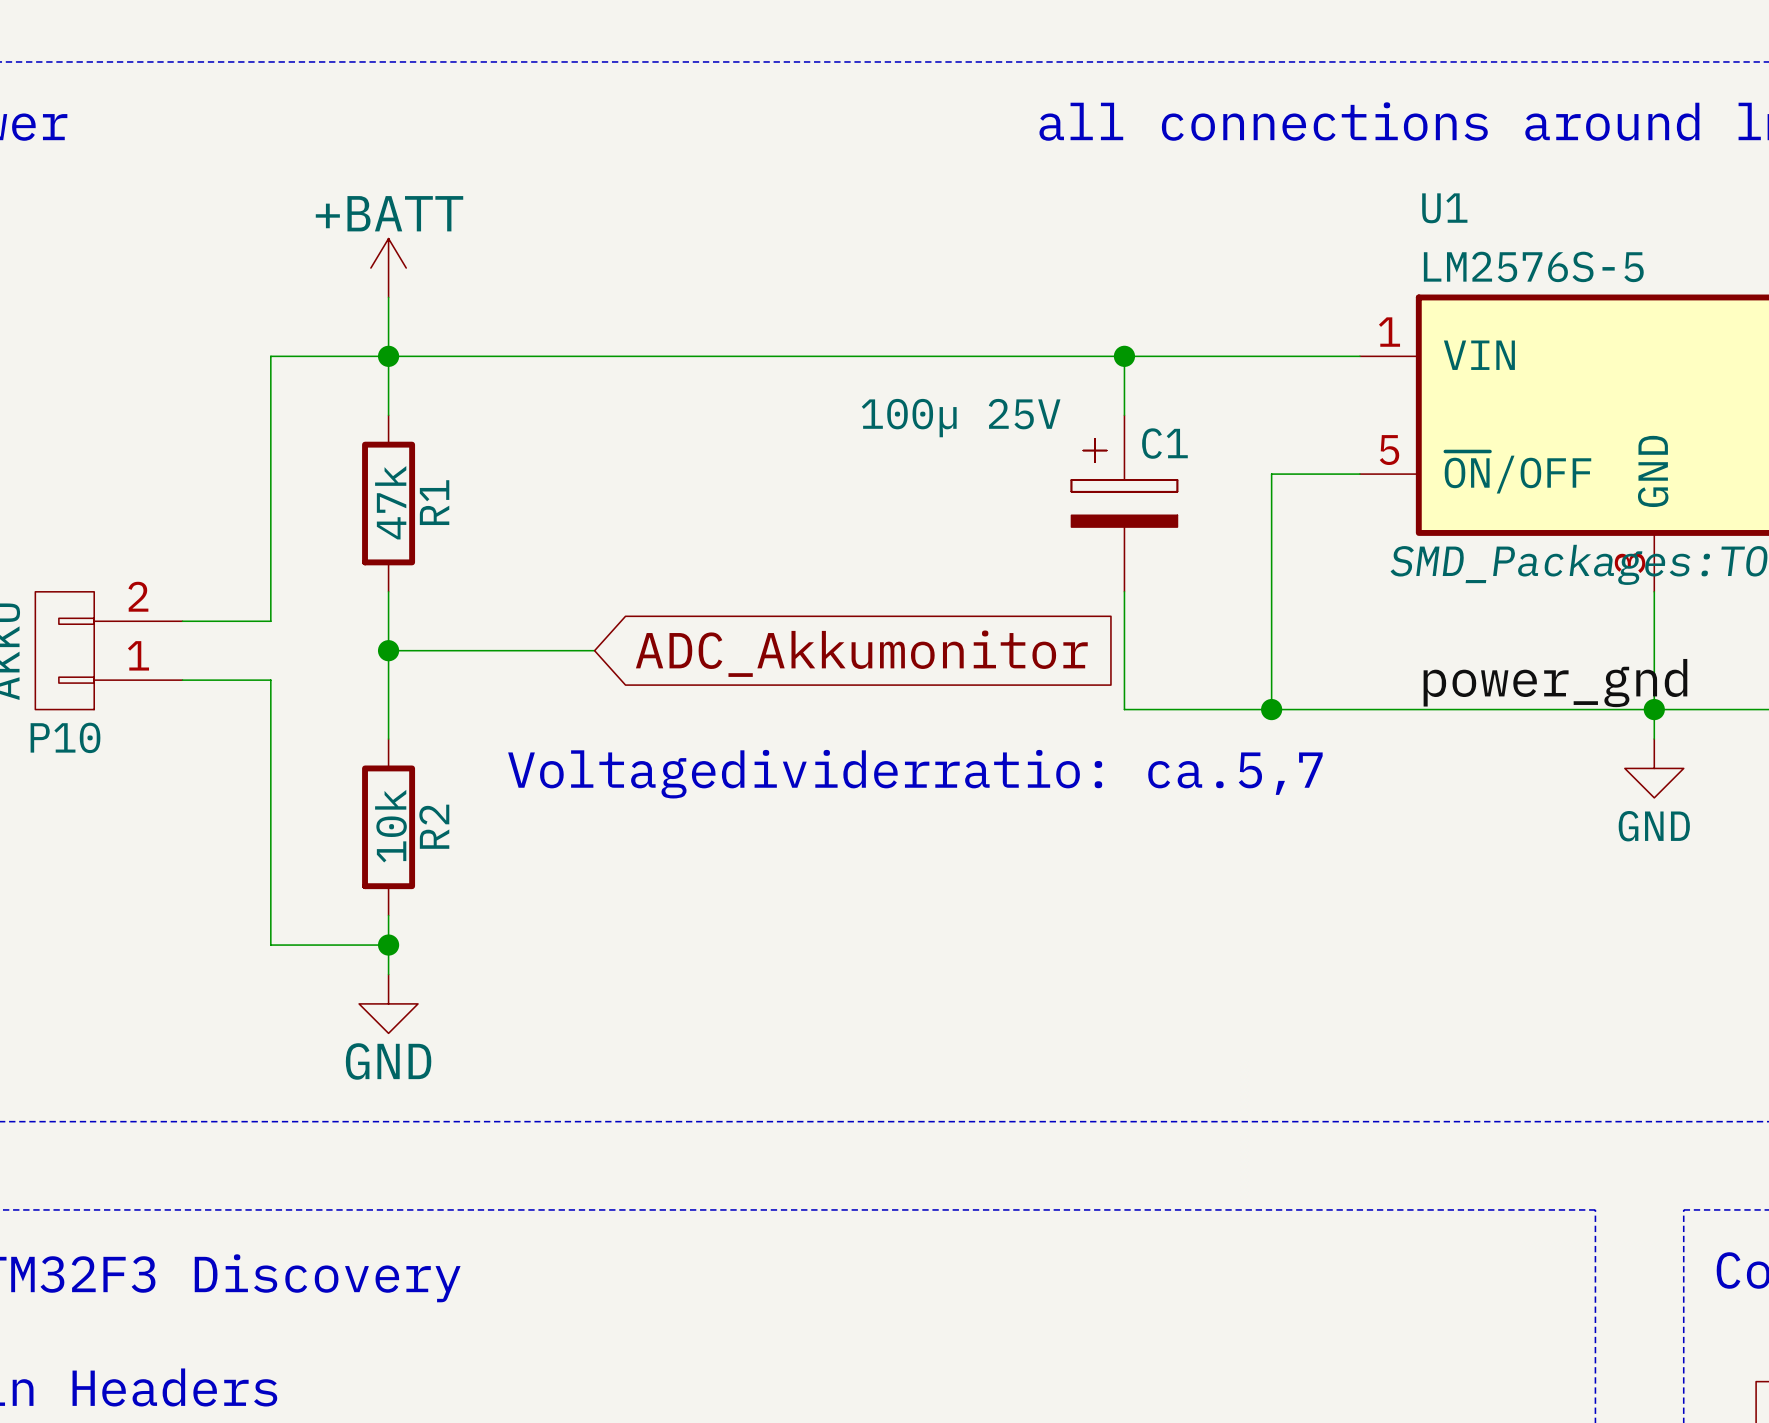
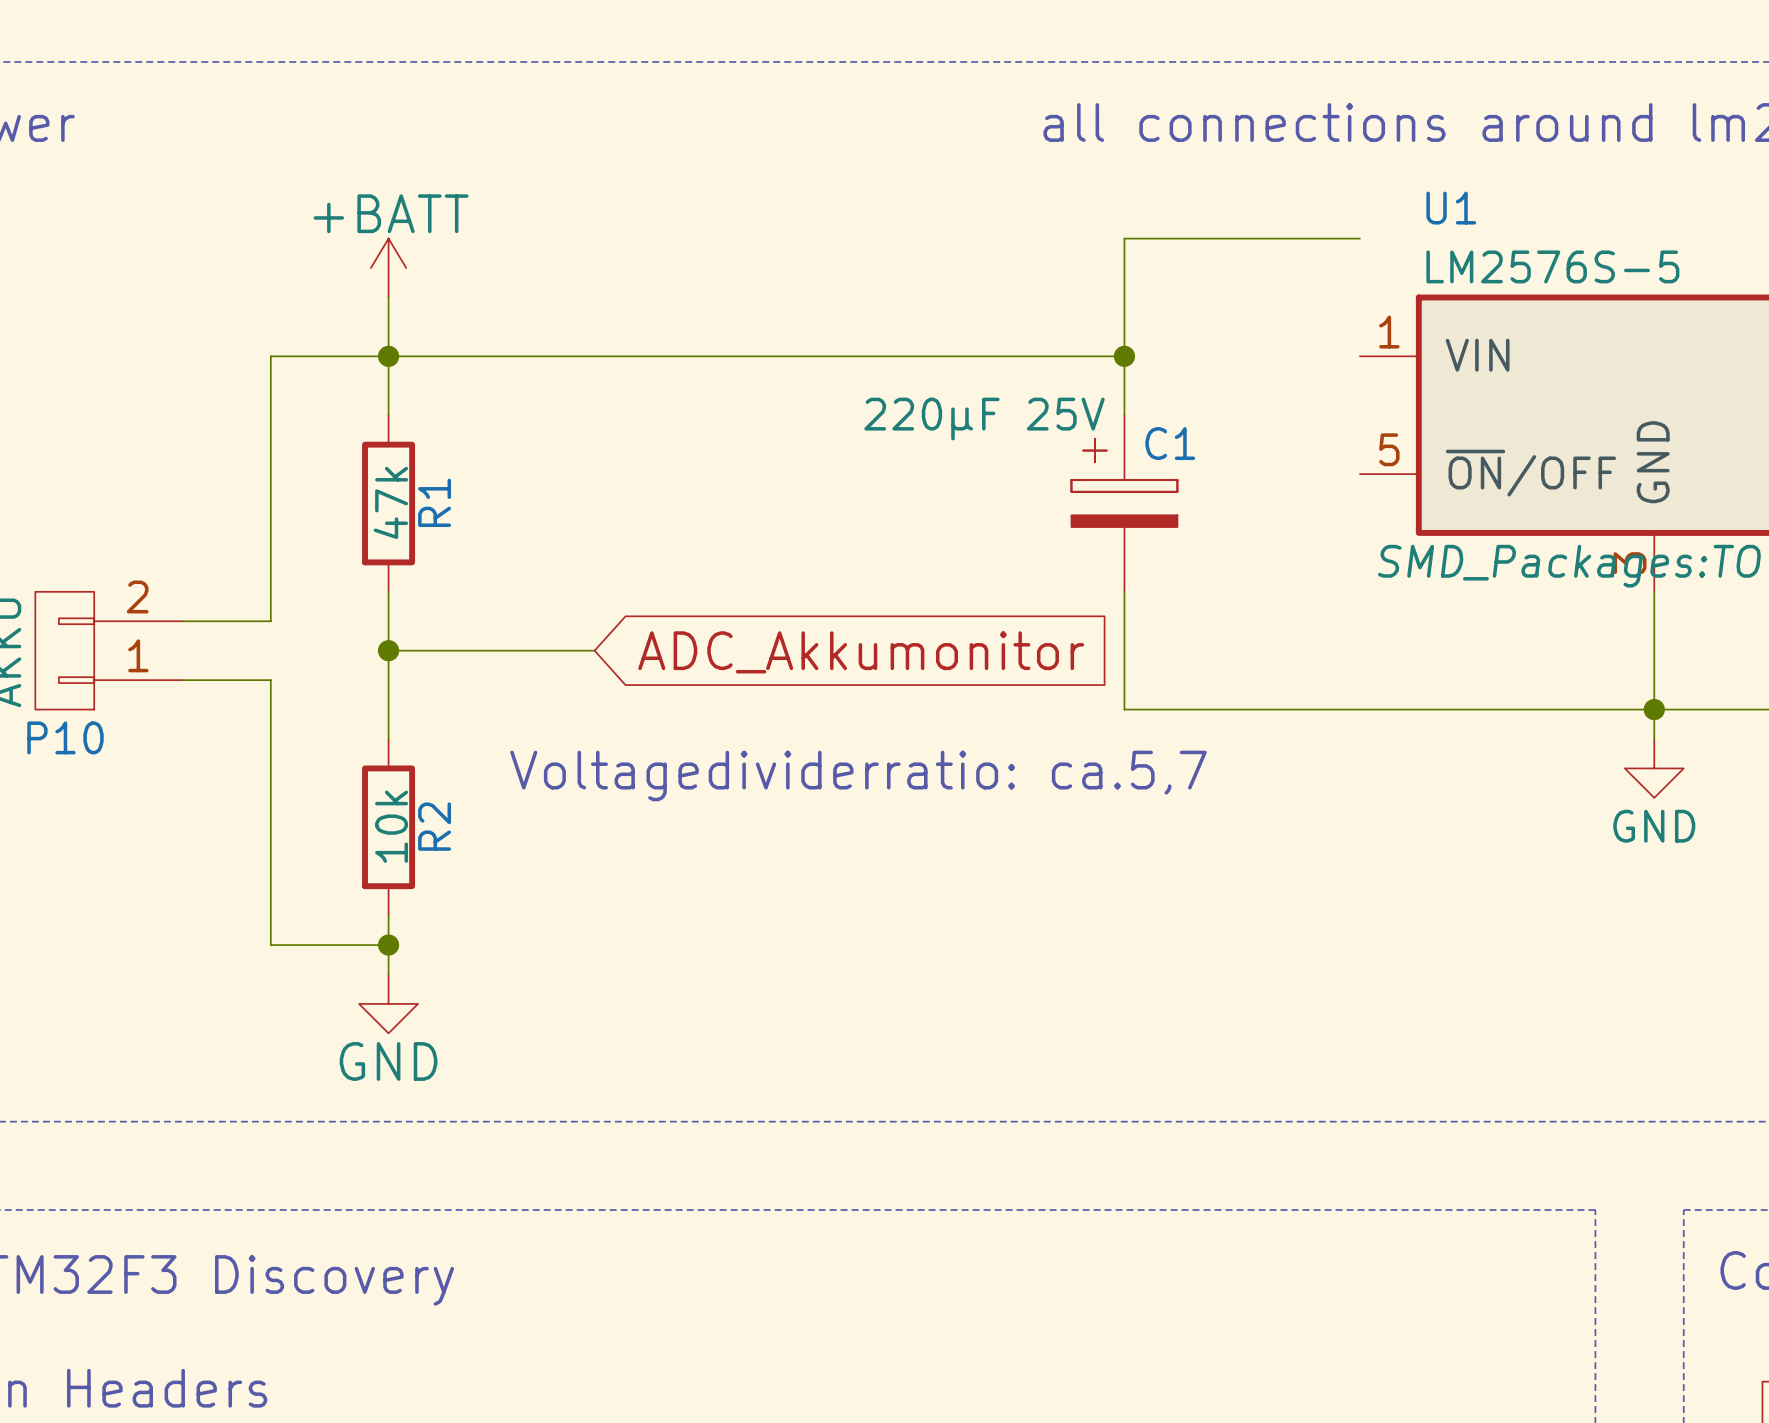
wire: (1124, 356) (1359, 356) -> (1124, 356) (1124, 238) (1359, 238)
C1 value: 100µ 25V (961, 418) -> 220µF 25V (984, 419)
wire: (1359, 474) (1271, 474) (1271, 709) -> none
label: power_gnd (1555, 683) -> none
junction: (1271, 709) -> none

